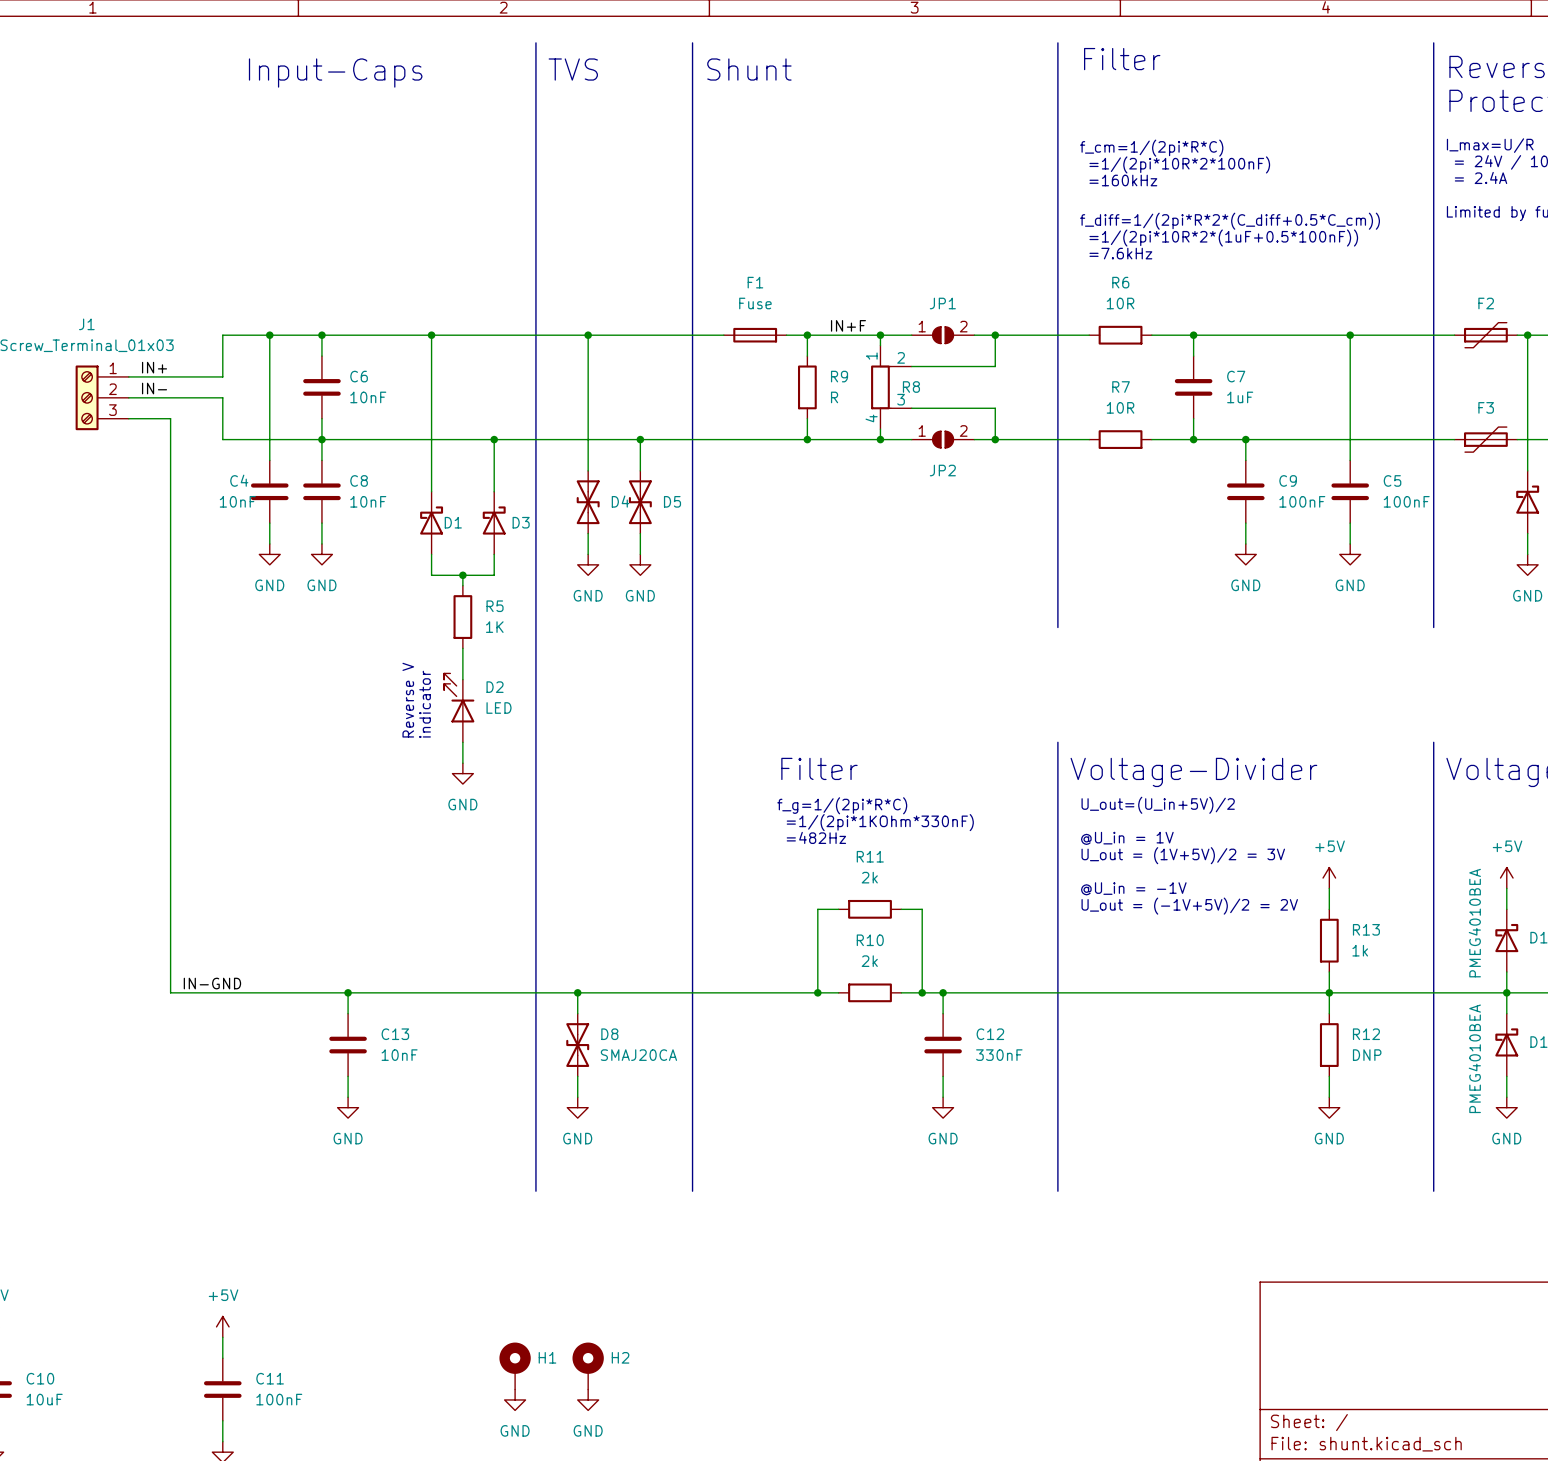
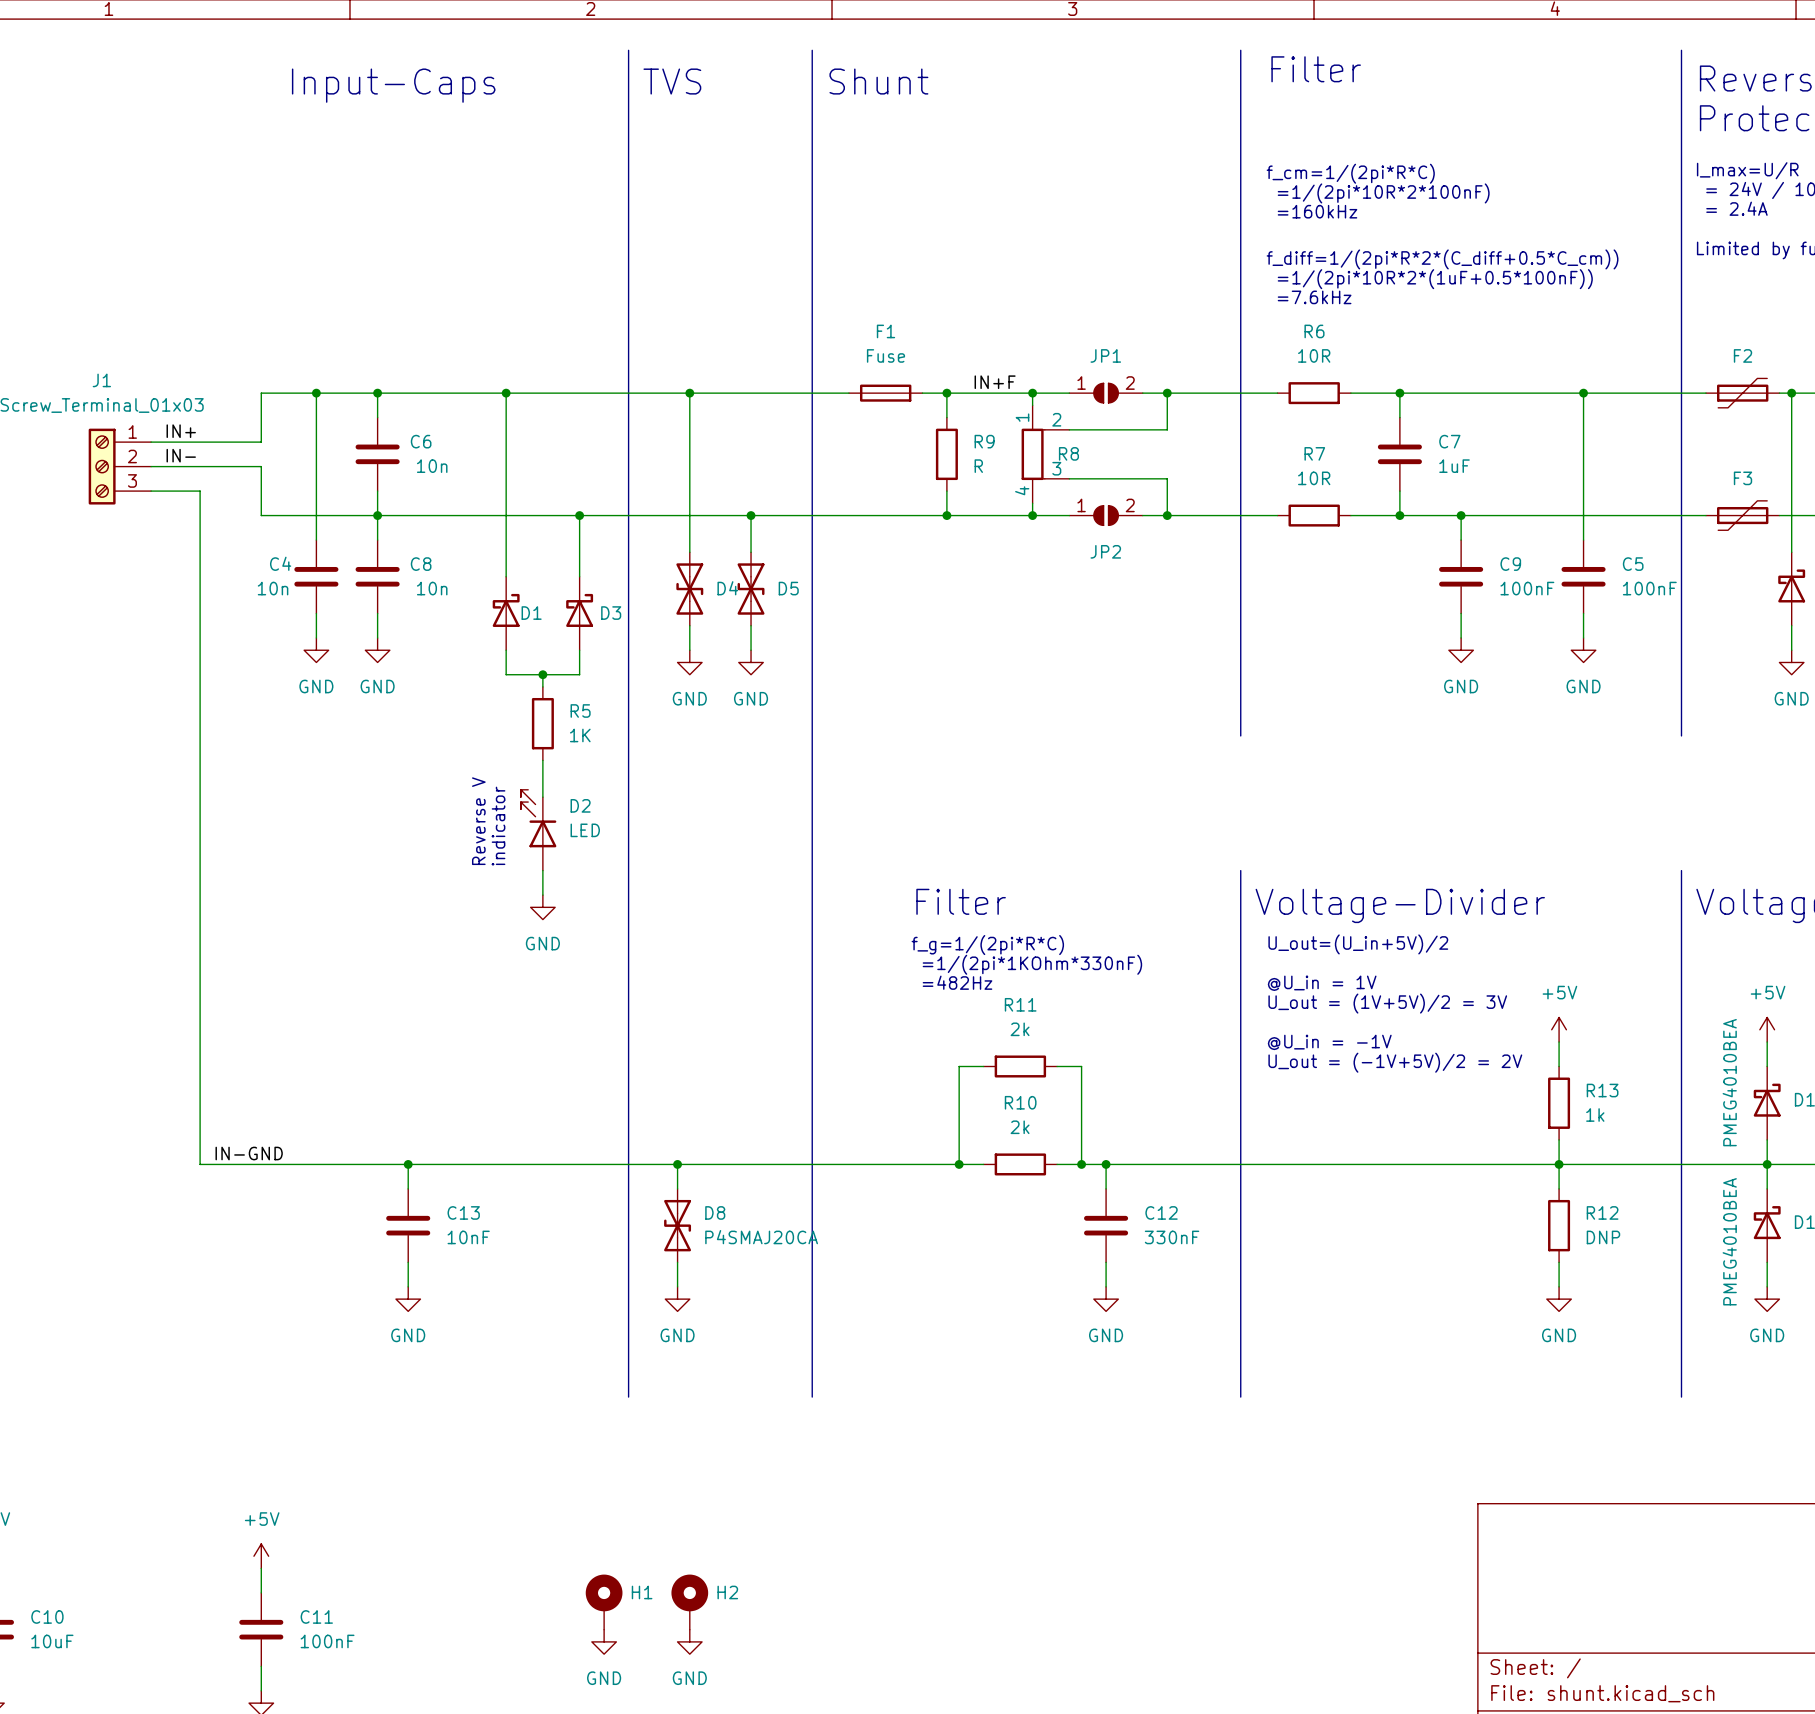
C6 value: 10nF (368, 397) -> 10n (432, 466)
C4 value: 10nF (237, 501) -> 10n (273, 588)
C8 value: 10nF (368, 501) -> 10n (432, 588)
D8 value: SMAJ20CA (638, 1055) -> P4SMAJ20CA (761, 1237)

